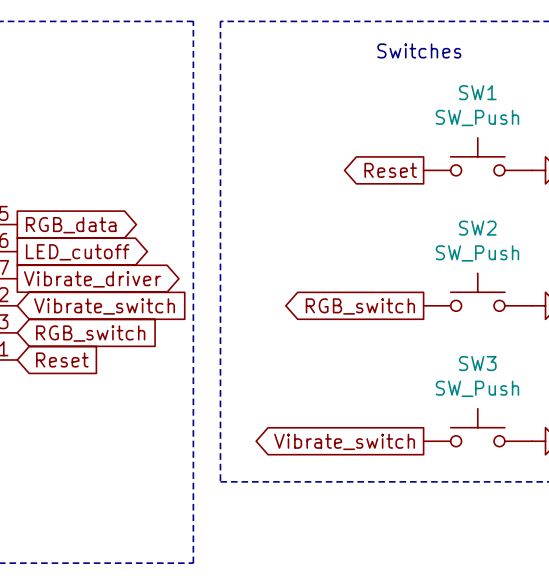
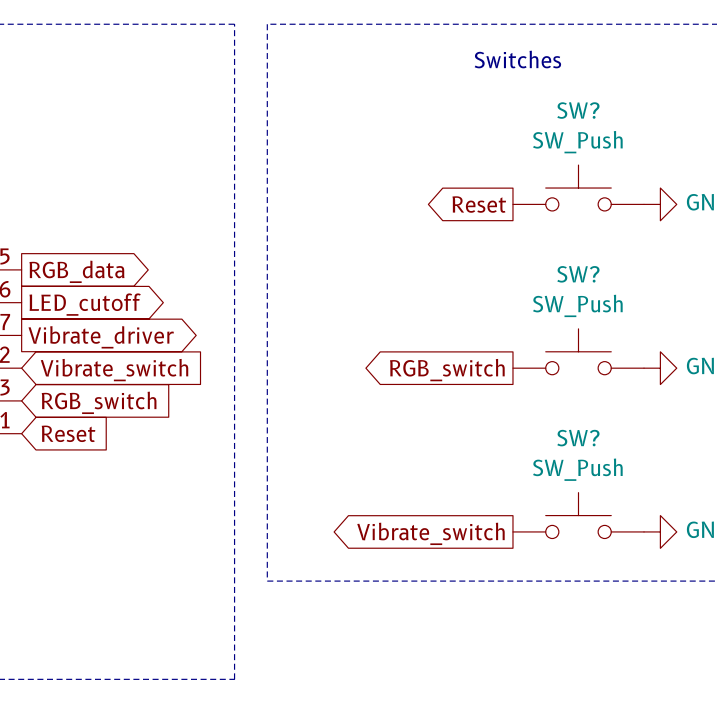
SW1 name: SW1 (477, 92) -> SW? (578, 110)
SW2 name: SW2 (477, 228) -> SW? (578, 274)
SW3 name: SW3 (477, 363) -> SW? (578, 438)

